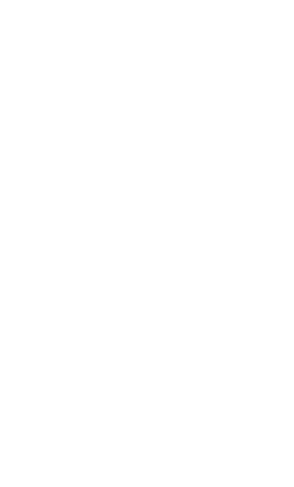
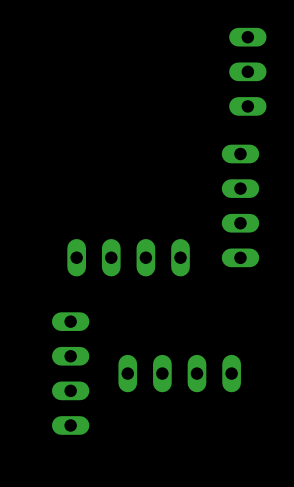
part: none -> (247, 71)
part: none -> (240, 205)
part: none -> (128, 257)
part: none -> (70, 373)
part: none -> (179, 373)

